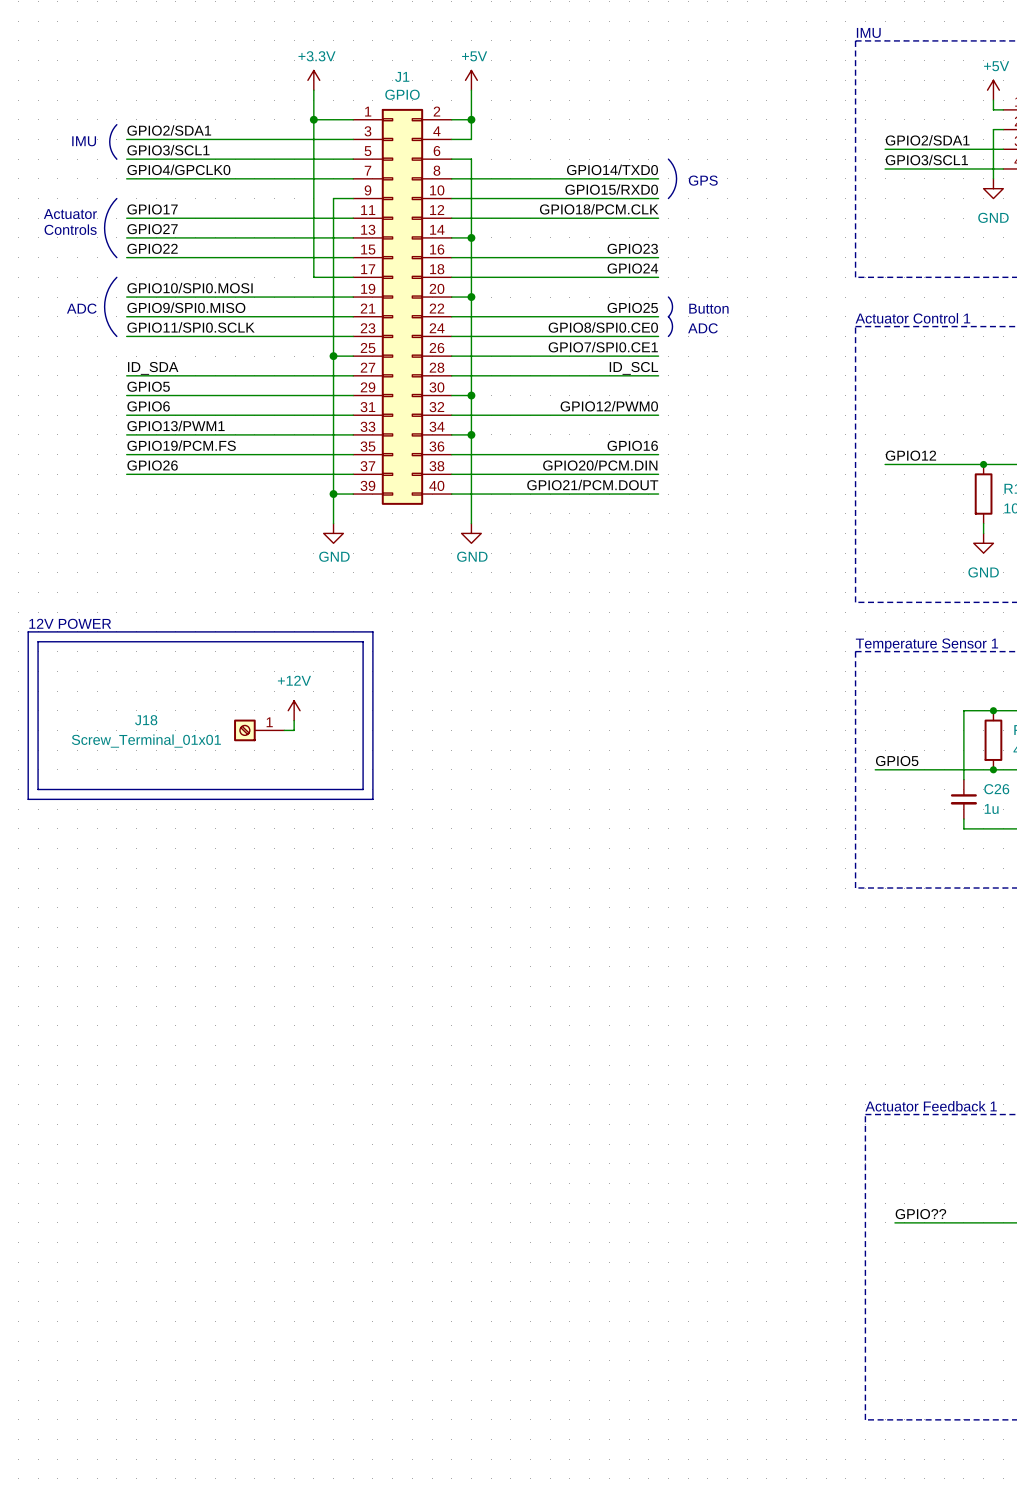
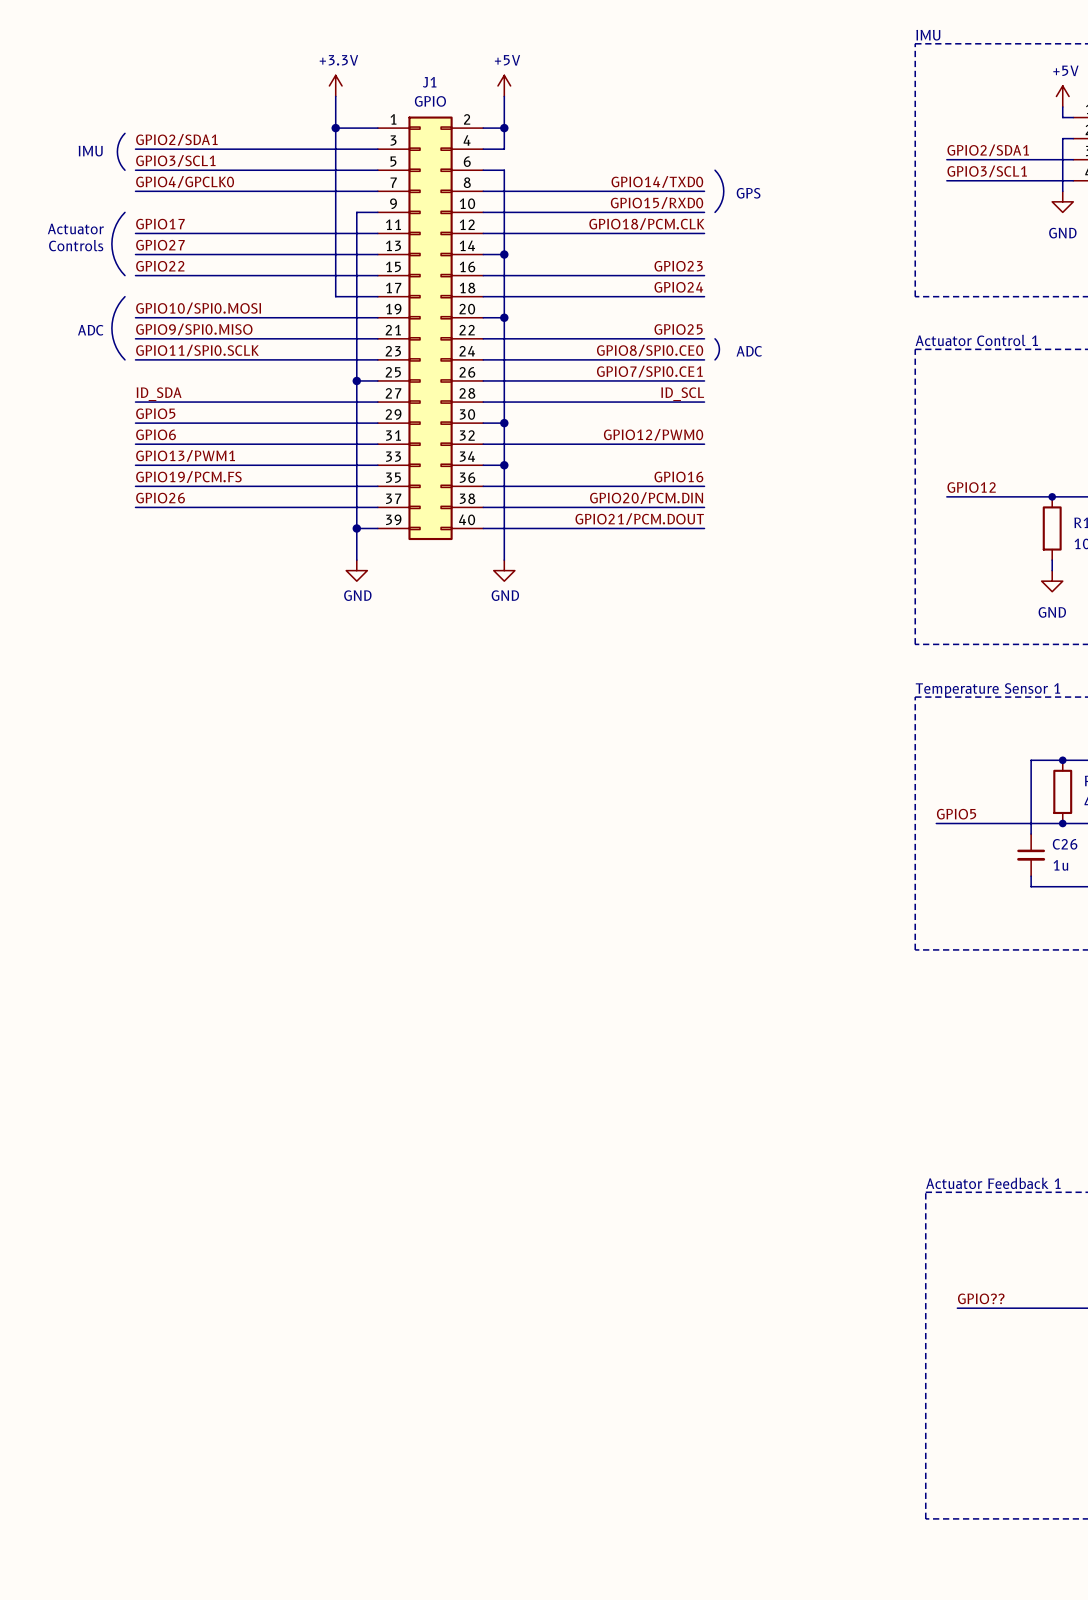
line: (668, 297) (672, 306) (668, 316) -> none
text: Button (708, 308) -> none
text: 12V POWER (70, 623) -> none
line: (28, 631) (372, 631) (372, 799) (28, 799) (28, 631) -> none
line: (38, 641) (363, 641) (363, 789) (38, 789) (38, 641) -> none
power symbol: +12V (294, 710) -> none
wire: (294, 720) (294, 730) (284, 730) -> none
J18: Screw_Terminal_01x01 (259, 730) -> none

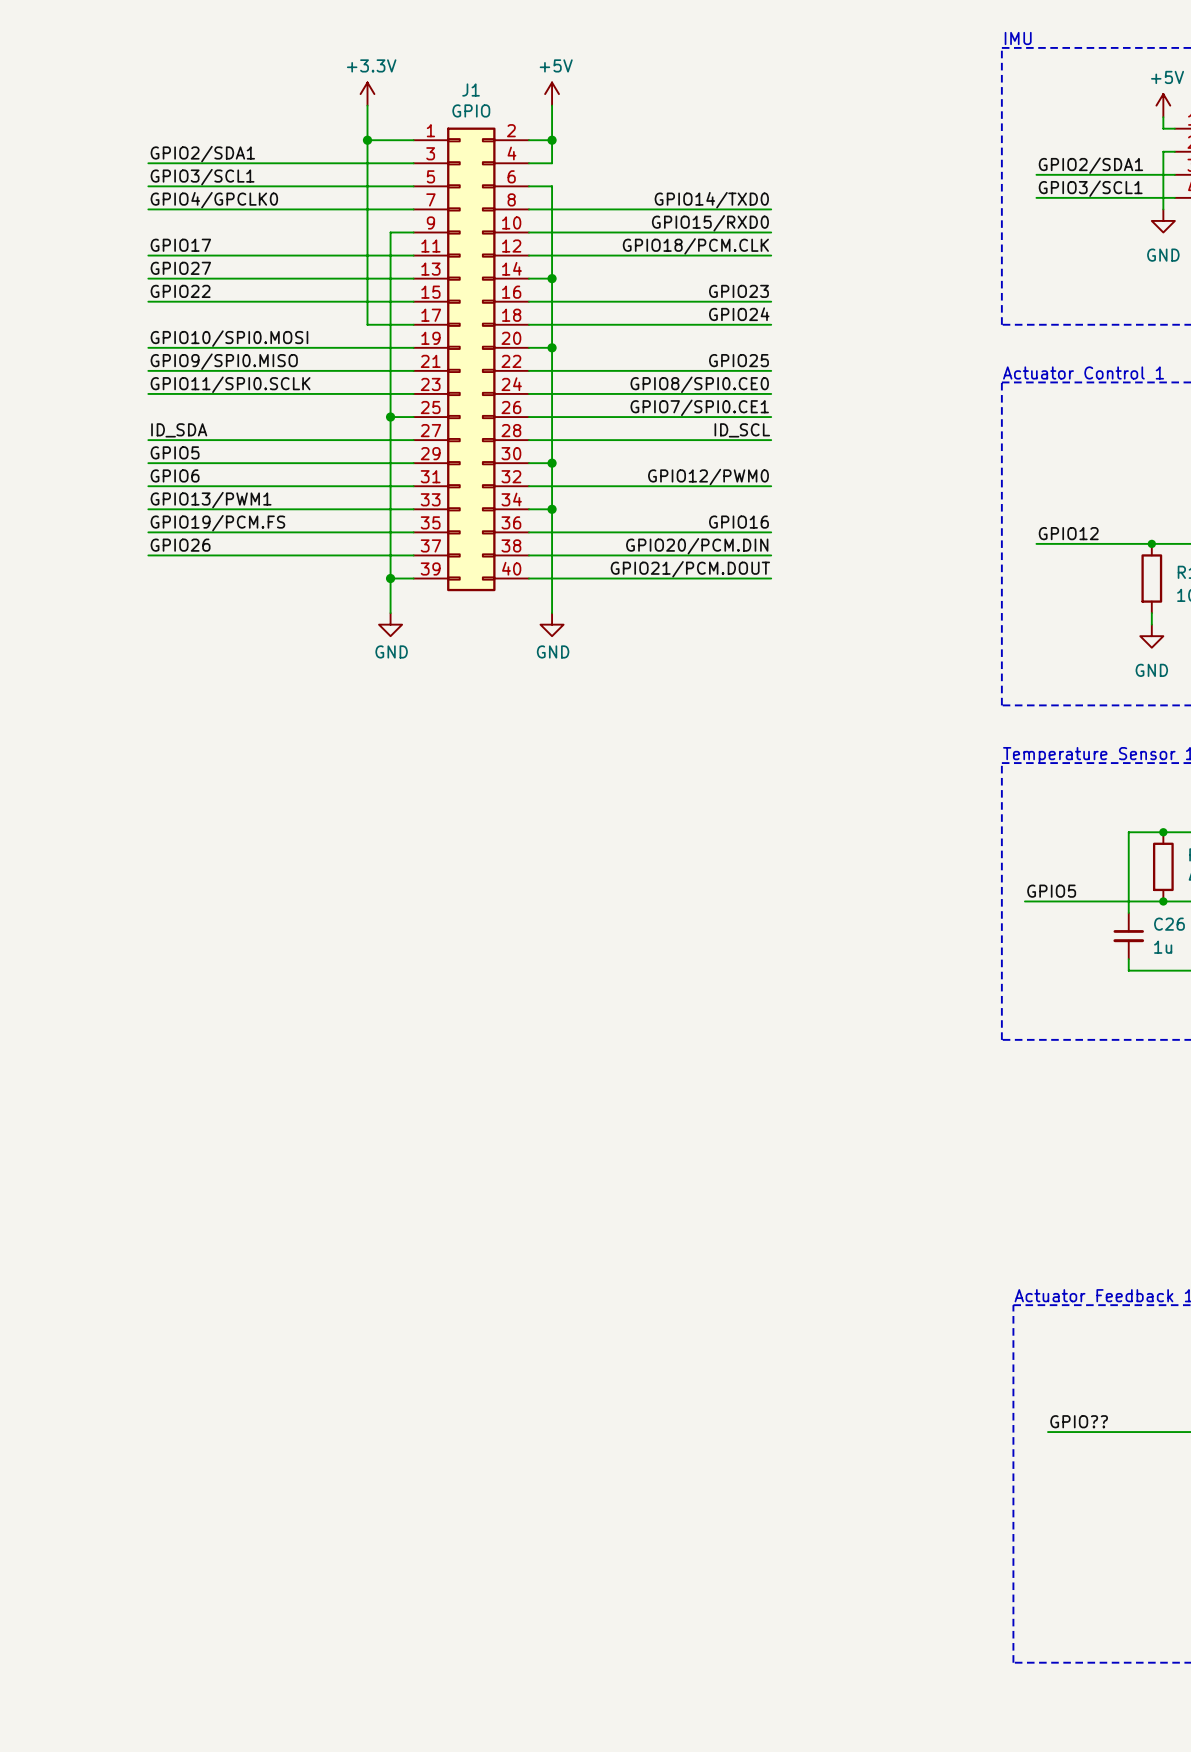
line: (124, 133) (119, 141) (117, 151) (119, 161) (124, 170) -> none
text: IMU (90, 151) -> none
line: (715, 170) (721, 179) (723, 191) (721, 202) (715, 212) -> none
text: GPS (748, 193) -> none
line: (124, 212) (114, 229) (111, 243) (116, 263) (124, 275) -> none
text: Actuator (75, 228) -> none
text: Controls (76, 245) -> none
line: (124, 296) (116, 308) (111, 328) (114, 343) (124, 359) -> none
text: ADC (90, 330) -> none
line: (715, 338) (719, 349) (715, 359) -> none
text: ADC (749, 351) -> none

